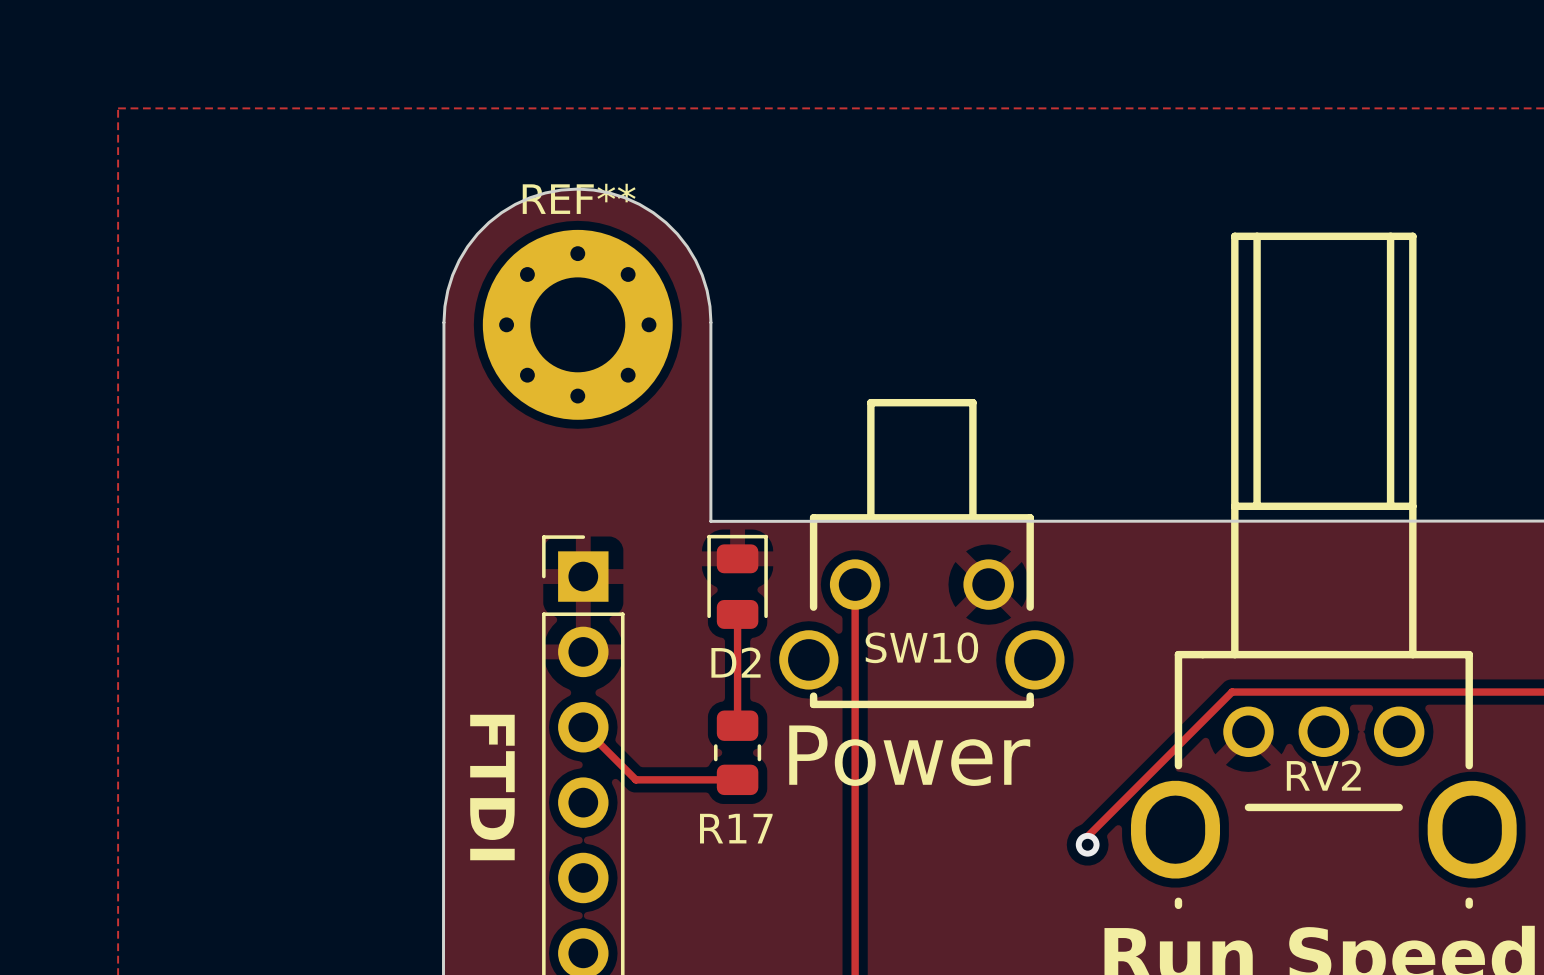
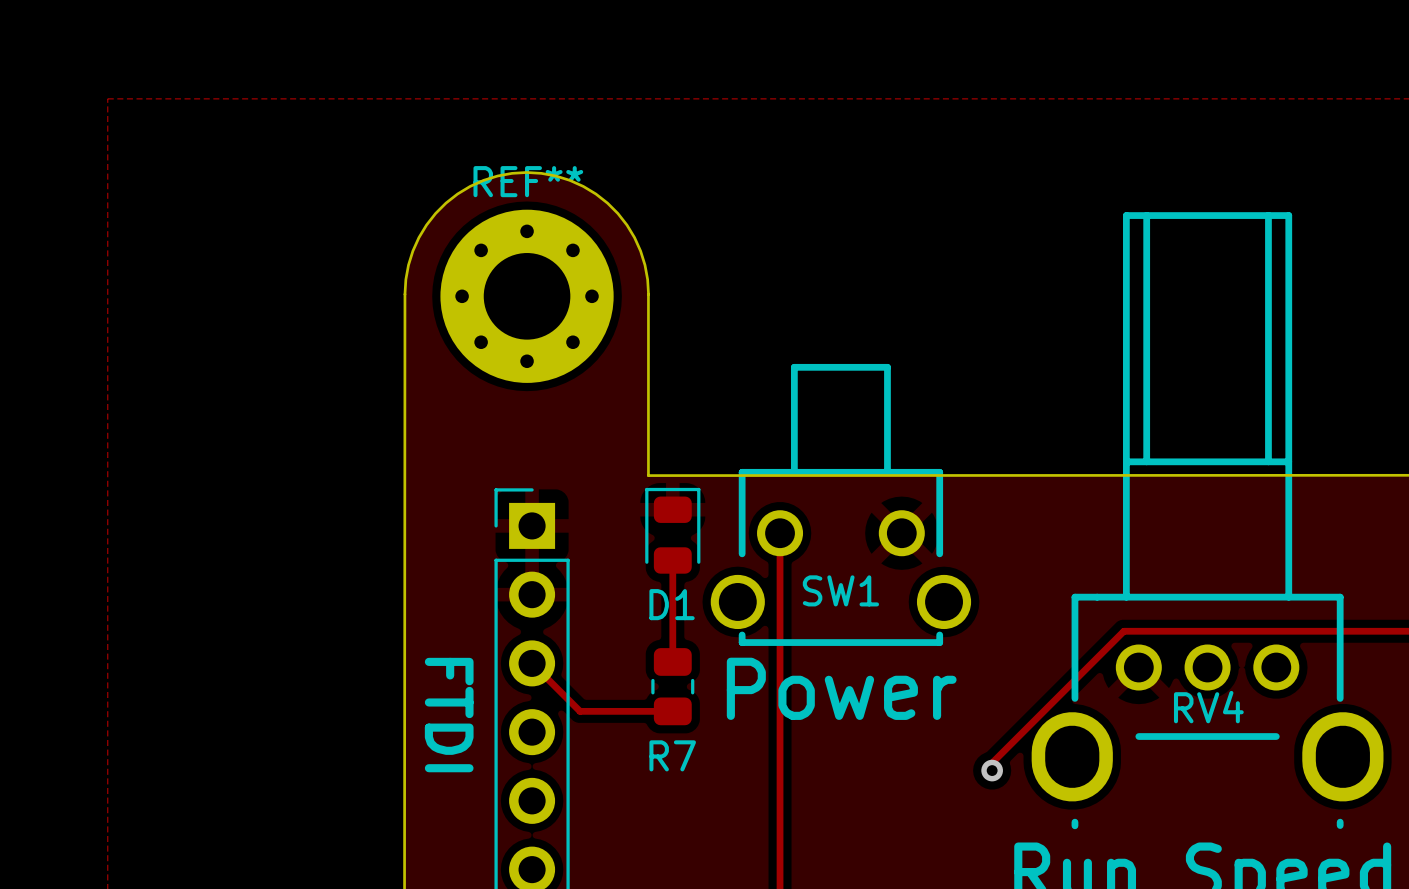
SW10 name: SW10 (921, 647) -> SW1 (840, 590)
D2 name: D2 (736, 662) -> D1 (672, 604)
RV2 name: RV2 (1323, 775) -> RV4 (1208, 707)
R17 name: R17 (736, 828) -> R7 (672, 755)

